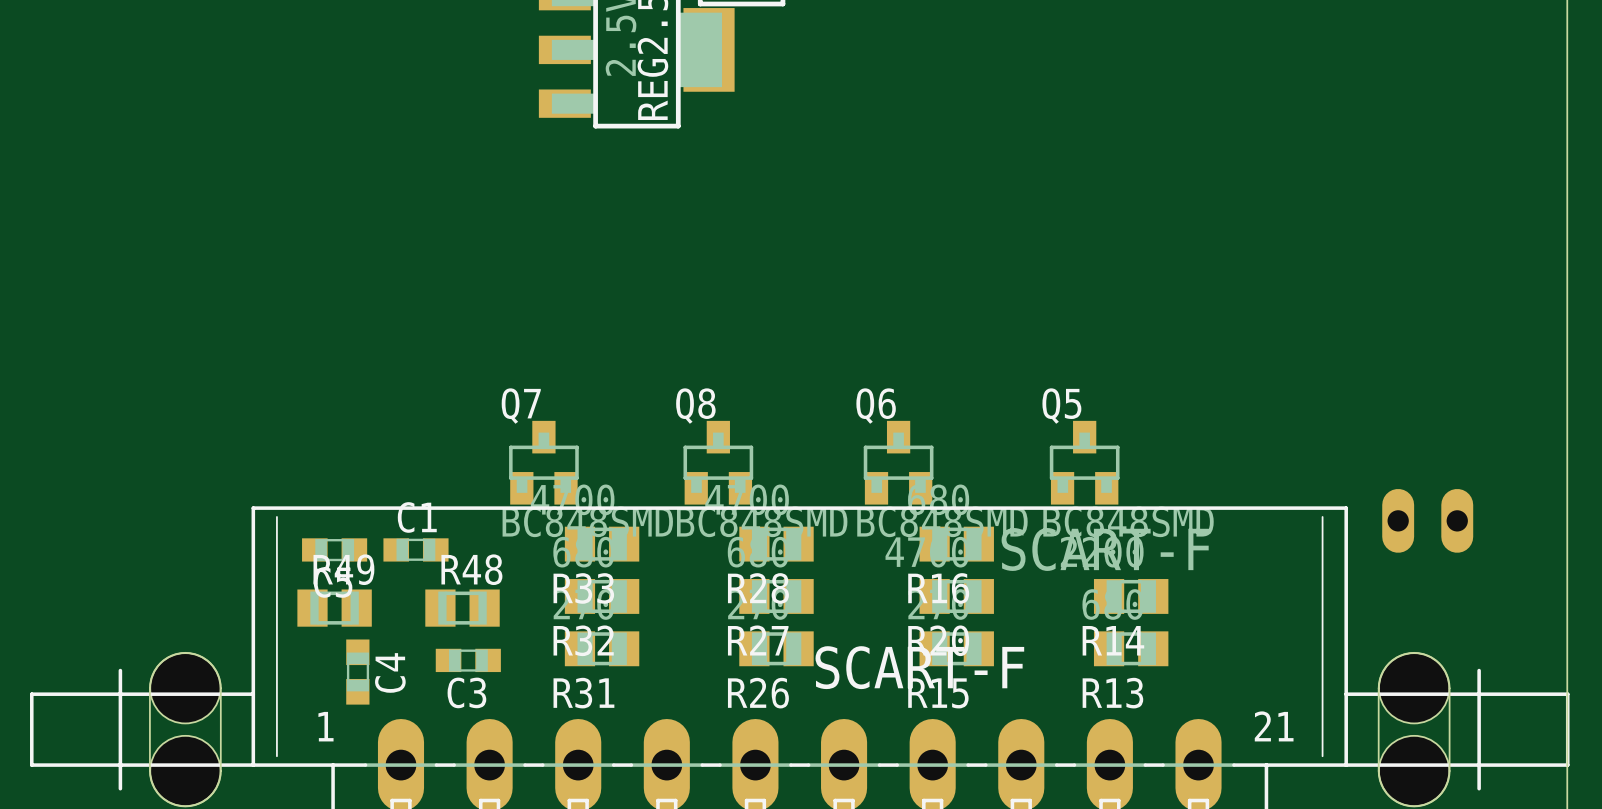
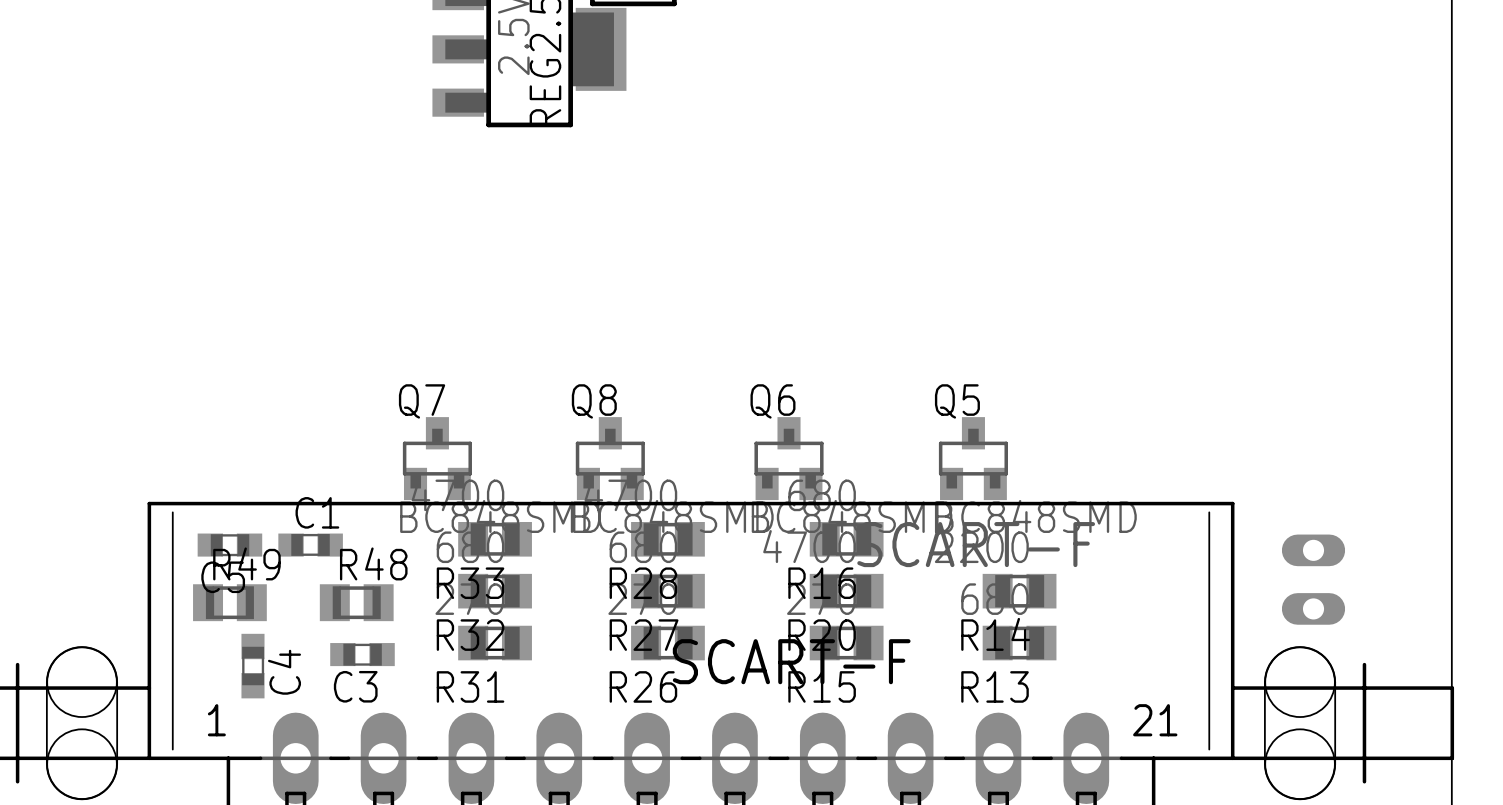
part rotation: 0° (1427, 520) -> 90° clockwise (1313, 579)
part position: (1427, 520) -> (1313, 579)

